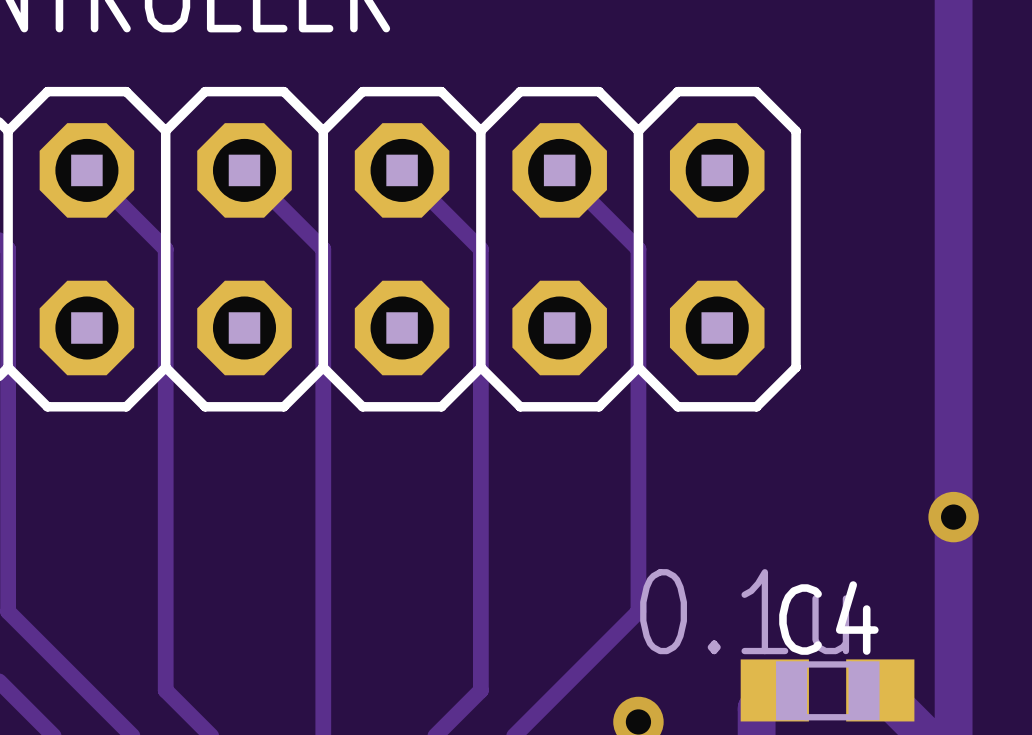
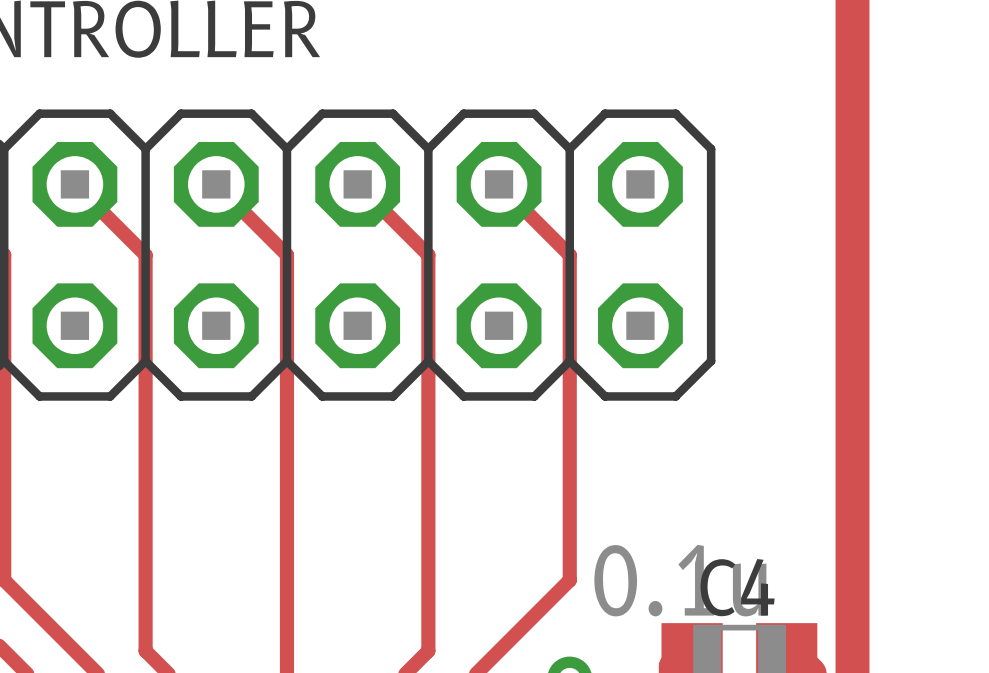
via: (953, 517) -> none

